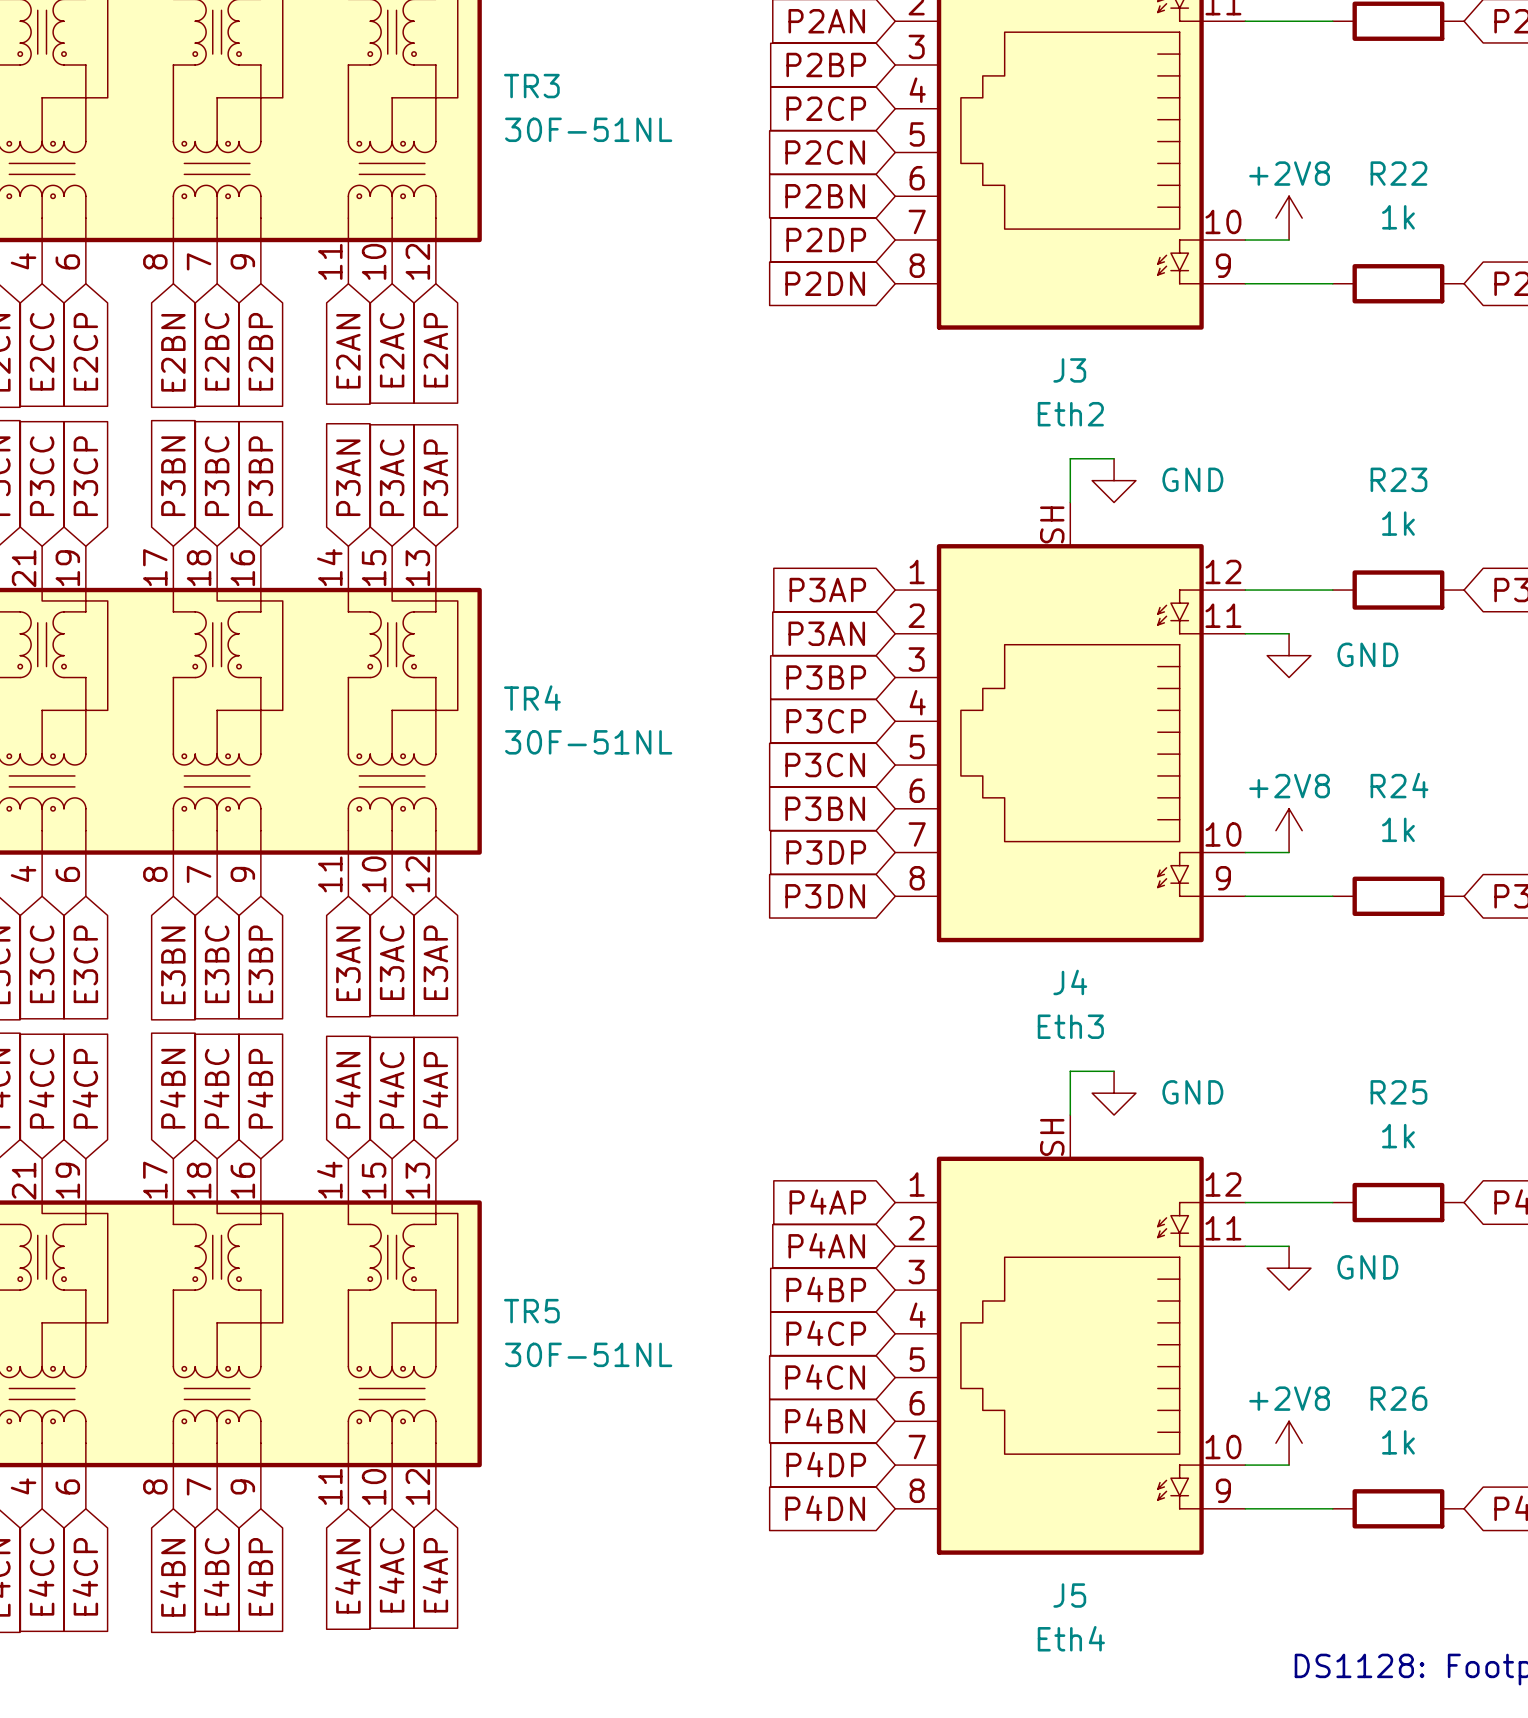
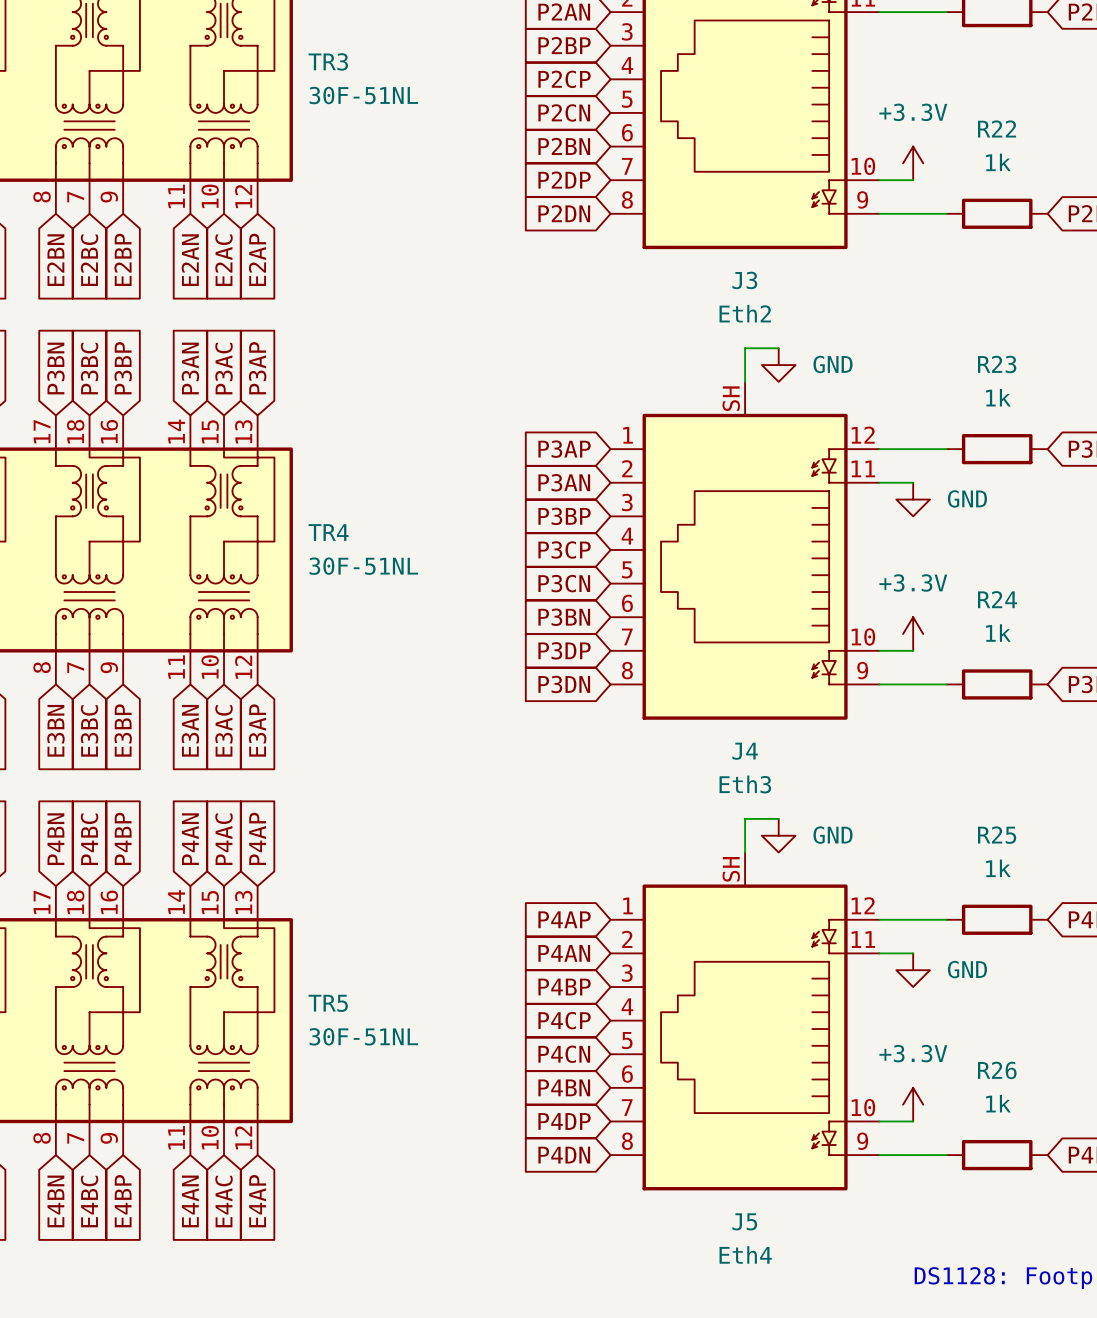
power symbol: +2V8 (1289, 218) -> +3.3V (913, 163)
power symbol: +2V8 (1289, 830) -> +3.3V (913, 634)
power symbol: +2V8 (1289, 1443) -> +3.3V (913, 1104)

